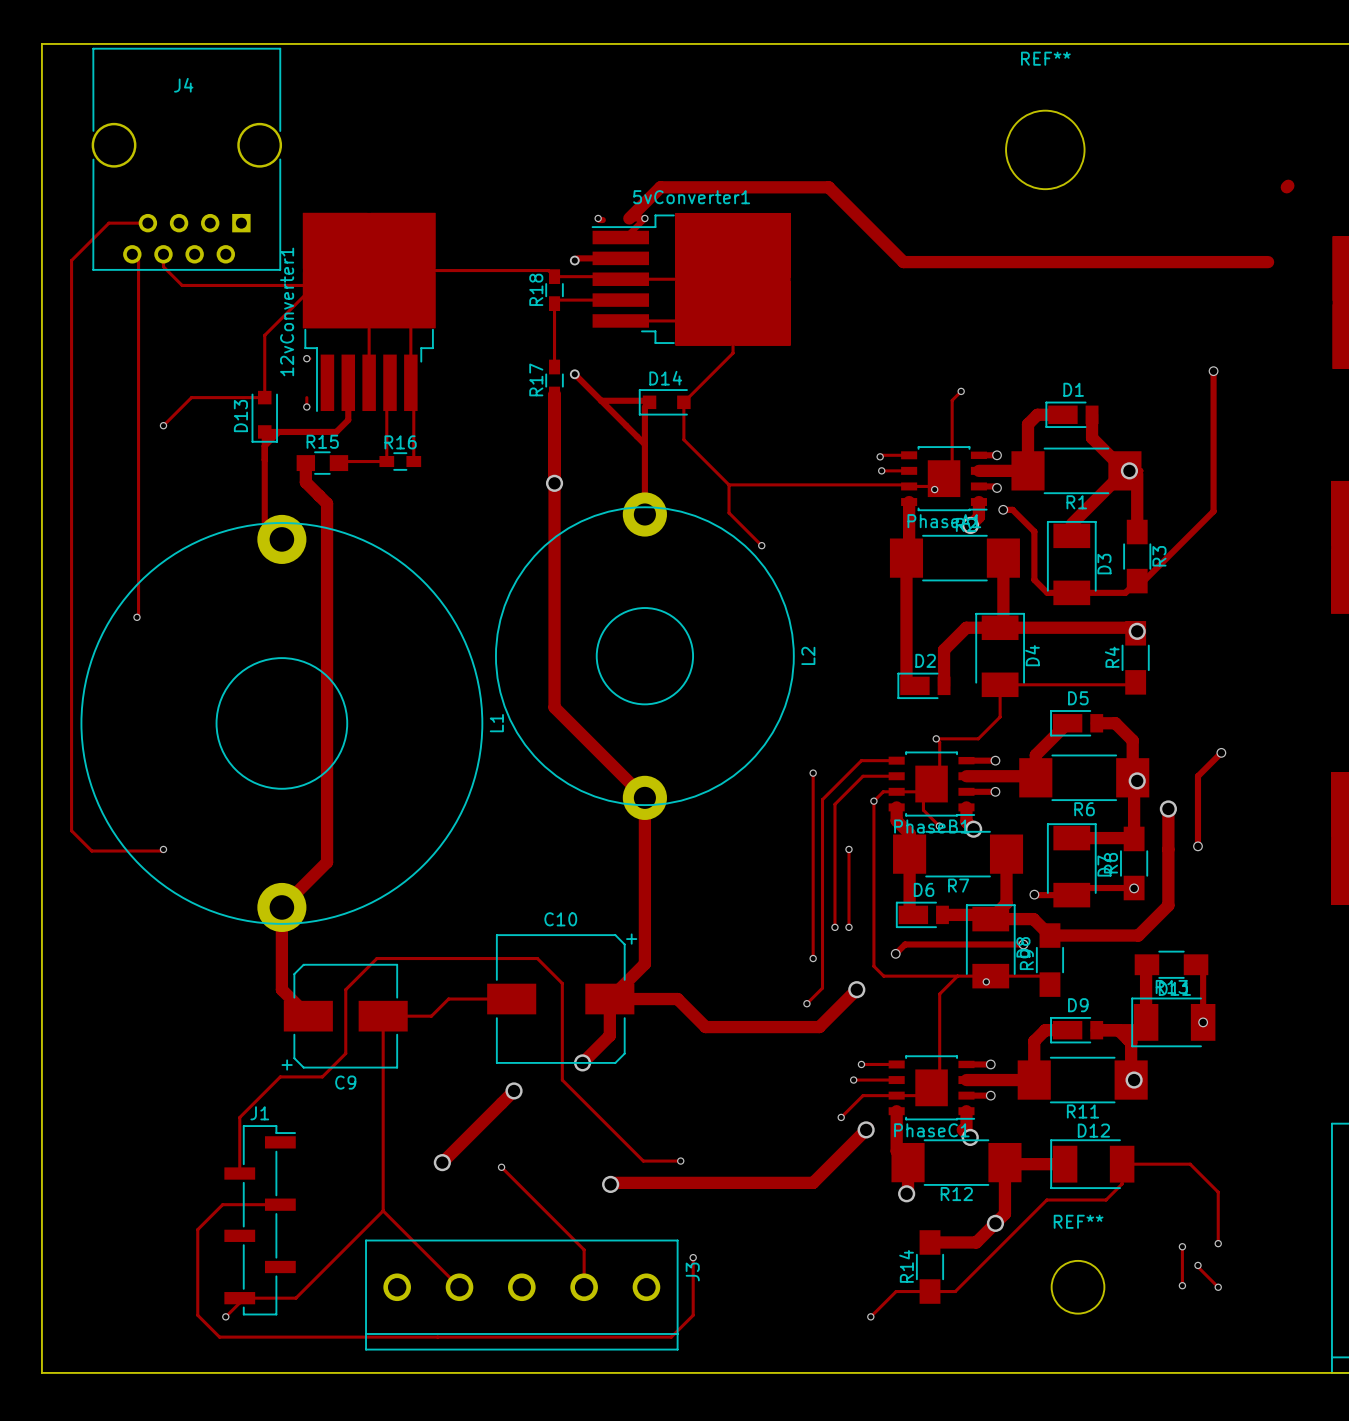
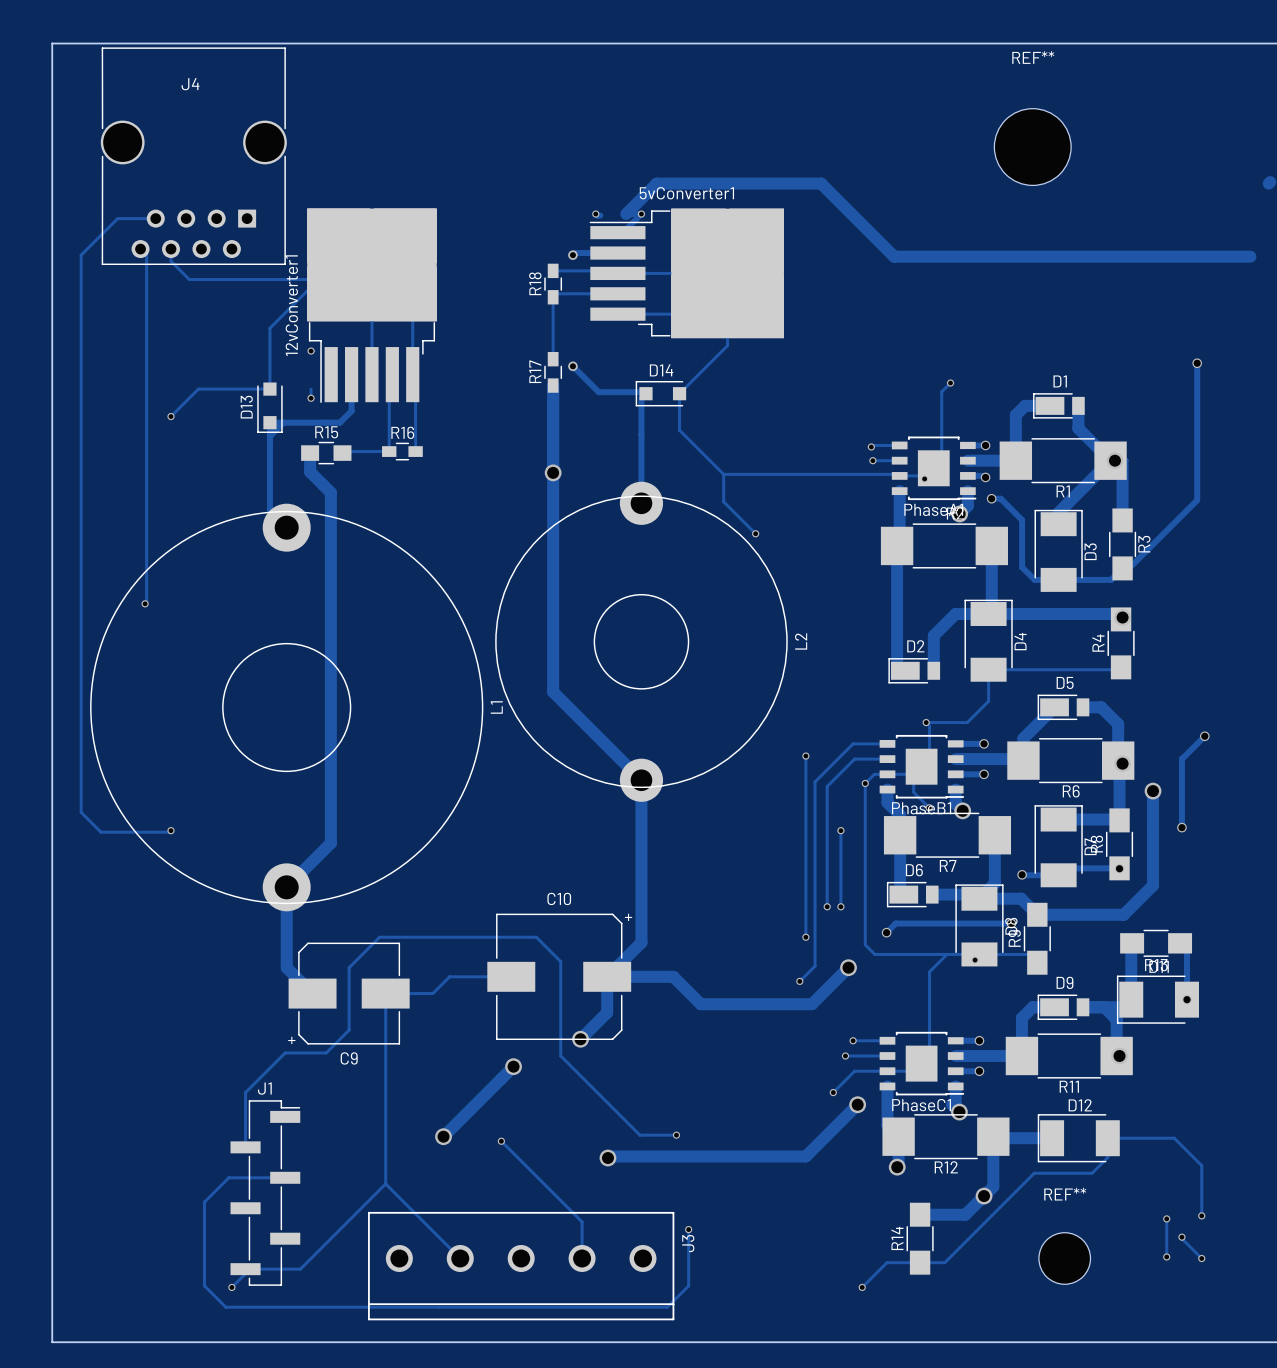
track: (369, 270) (548, 270) (554, 276) -> none
track: (601, 400) (644, 444) -> none

